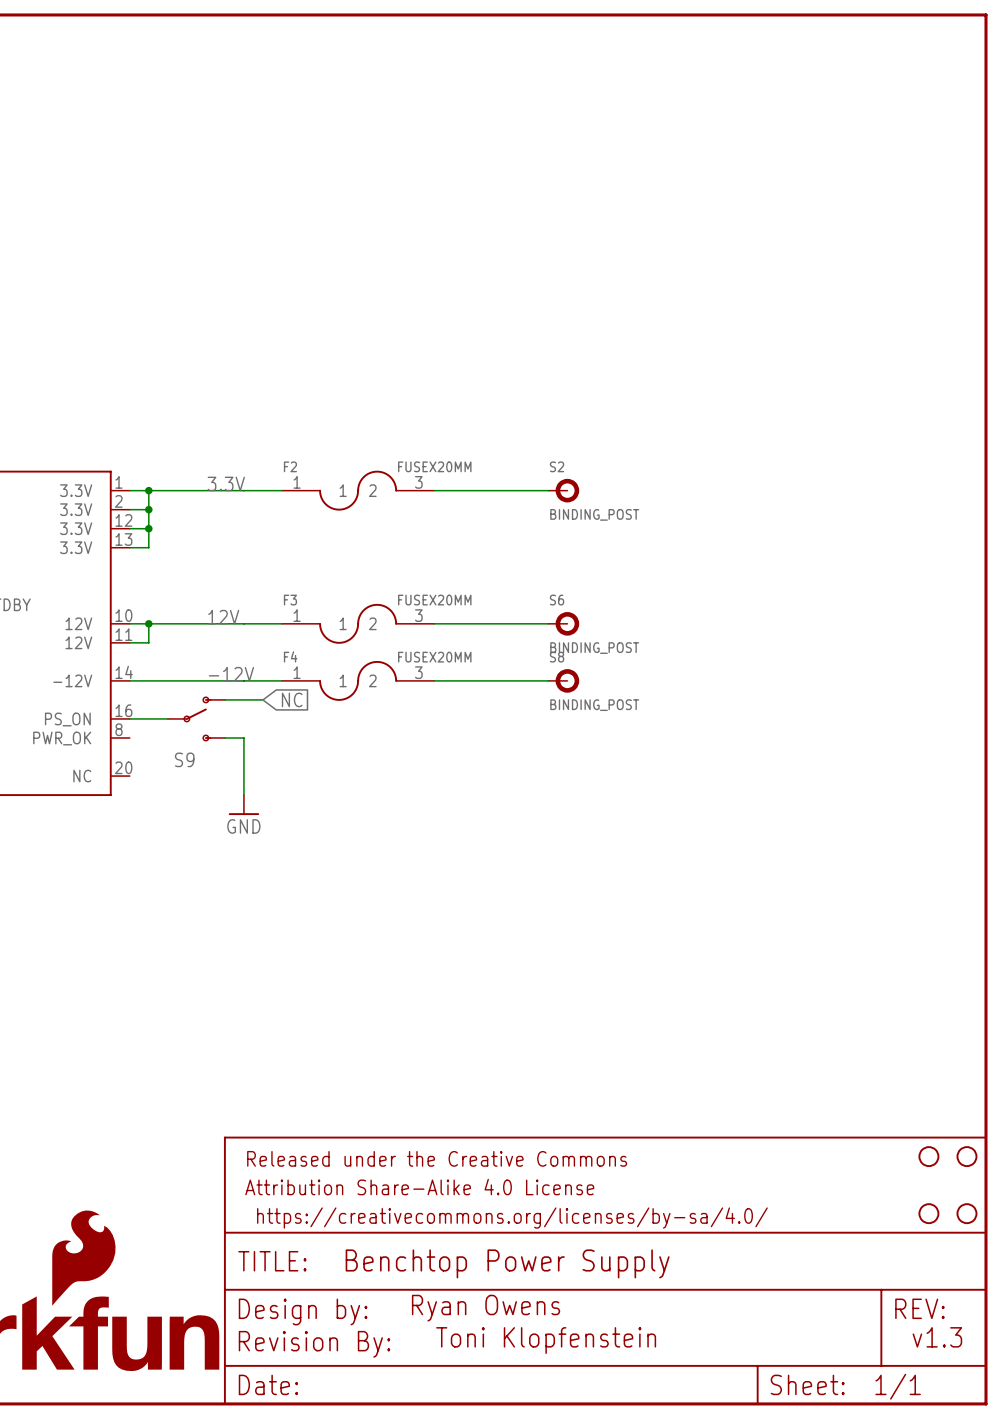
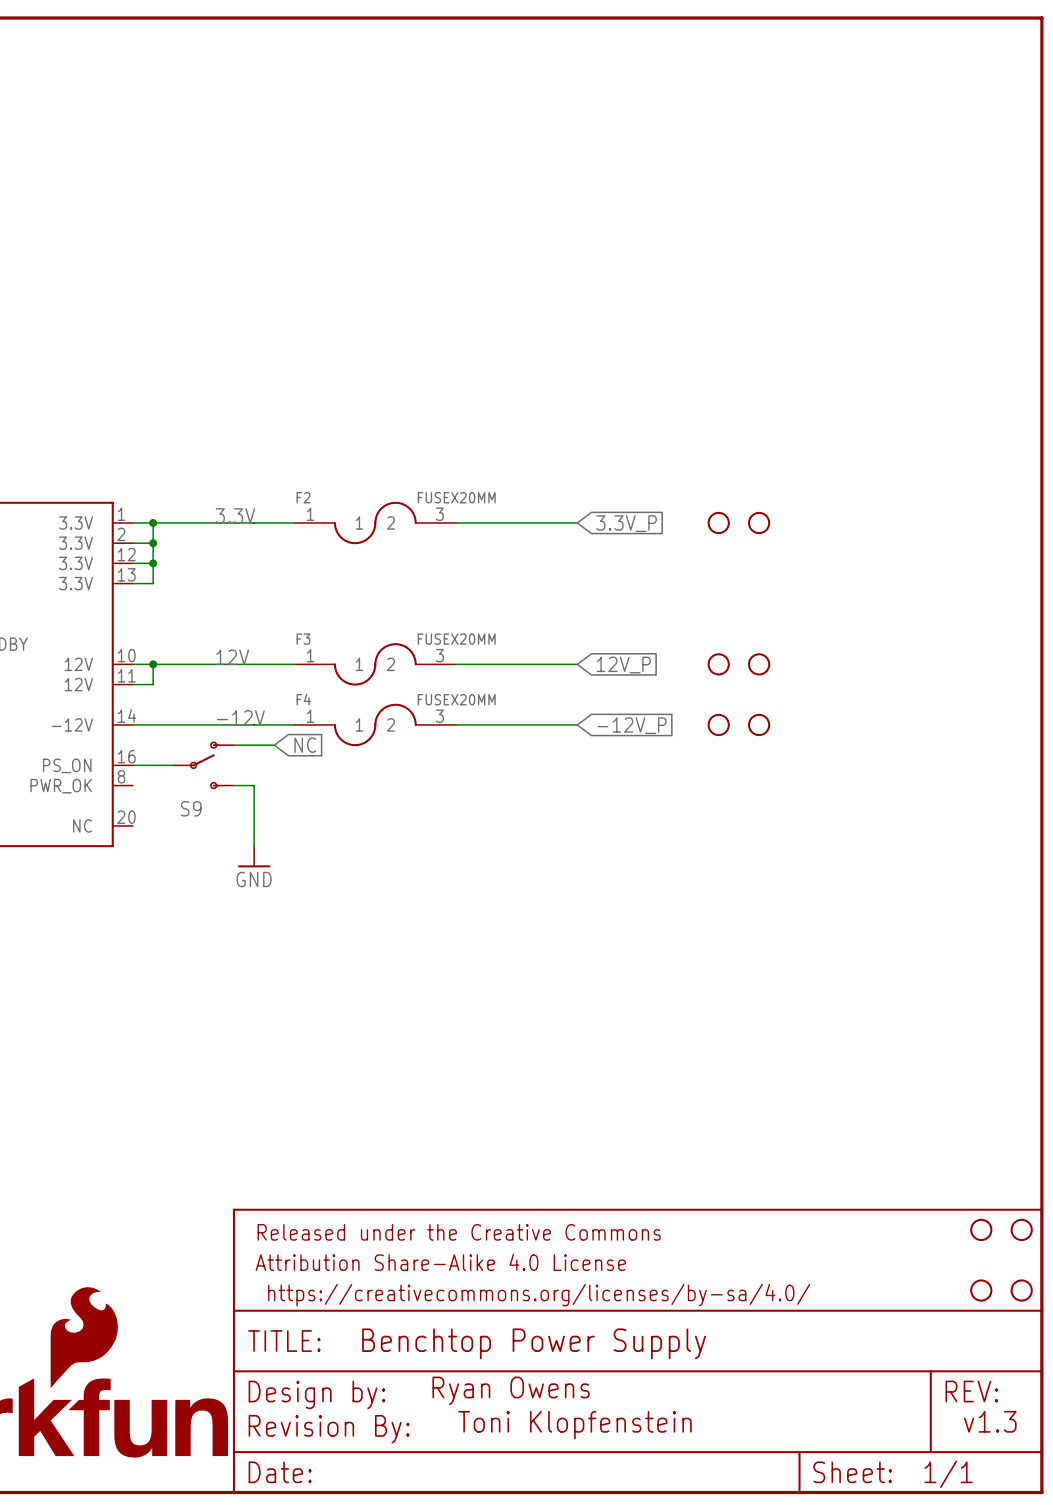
S2: BINDING_POST (563, 490) -> none
part: none -> (718, 522)
part: none -> (759, 522)
global label: none -> 3.3V_P (626, 523)
S6: BINDING_POST (563, 623) -> none
part: none -> (718, 664)
part: none -> (759, 664)
global label: none -> 12V_P (623, 665)
S8: BINDING_POST (563, 680) -> none
part: none -> (718, 724)
part: none -> (759, 724)
global label: none -> -12V_P (632, 725)

